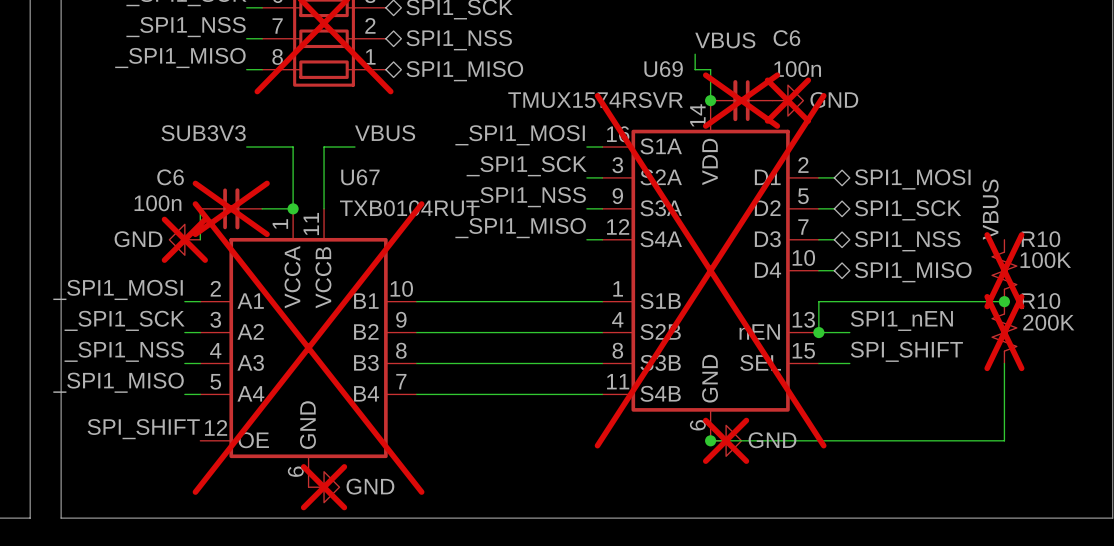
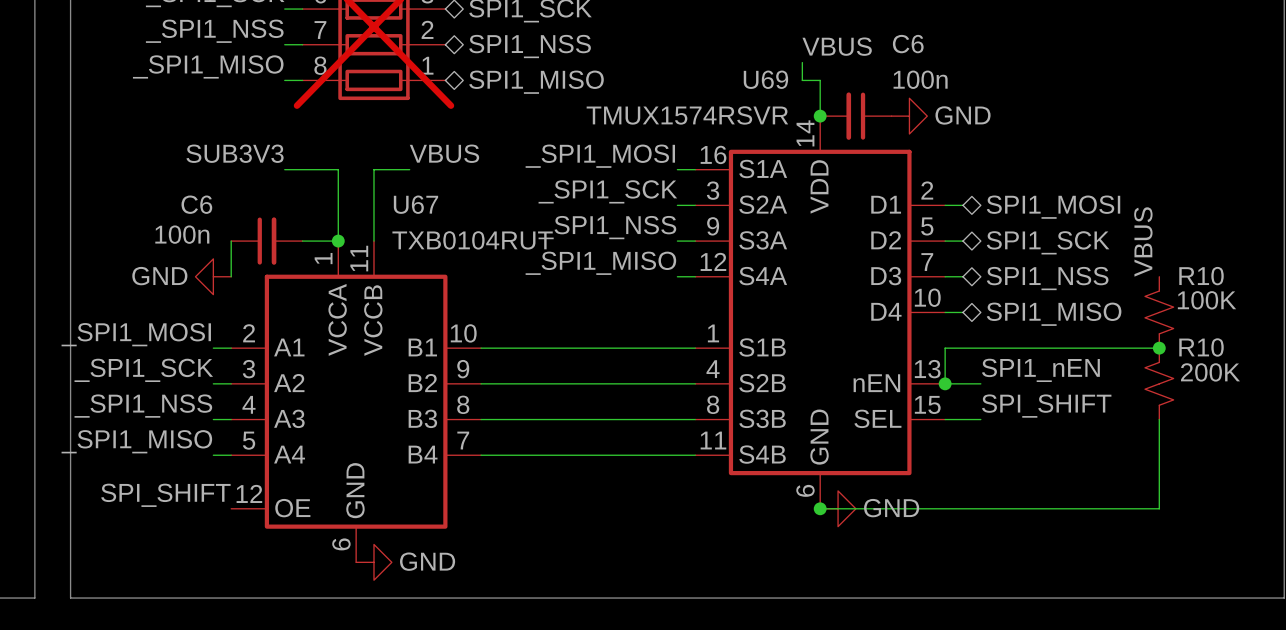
C6 do-not-place cross: (741, 100) -> none
power symbol do-not-place cross: (787, 100) -> none
C6 do-not-place cross: (231, 208) -> none
power symbol do-not-place cross: (184, 239) -> none
U69 do-not-place cross: (710, 270) -> none
R10 do-not-place cross: (1004, 270) -> none
R10 do-not-place cross: (1004, 332) -> none
U67 do-not-place cross: (308, 348) -> none
power symbol do-not-place cross: (726, 440) -> none
power symbol do-not-place cross: (324, 487) -> none

